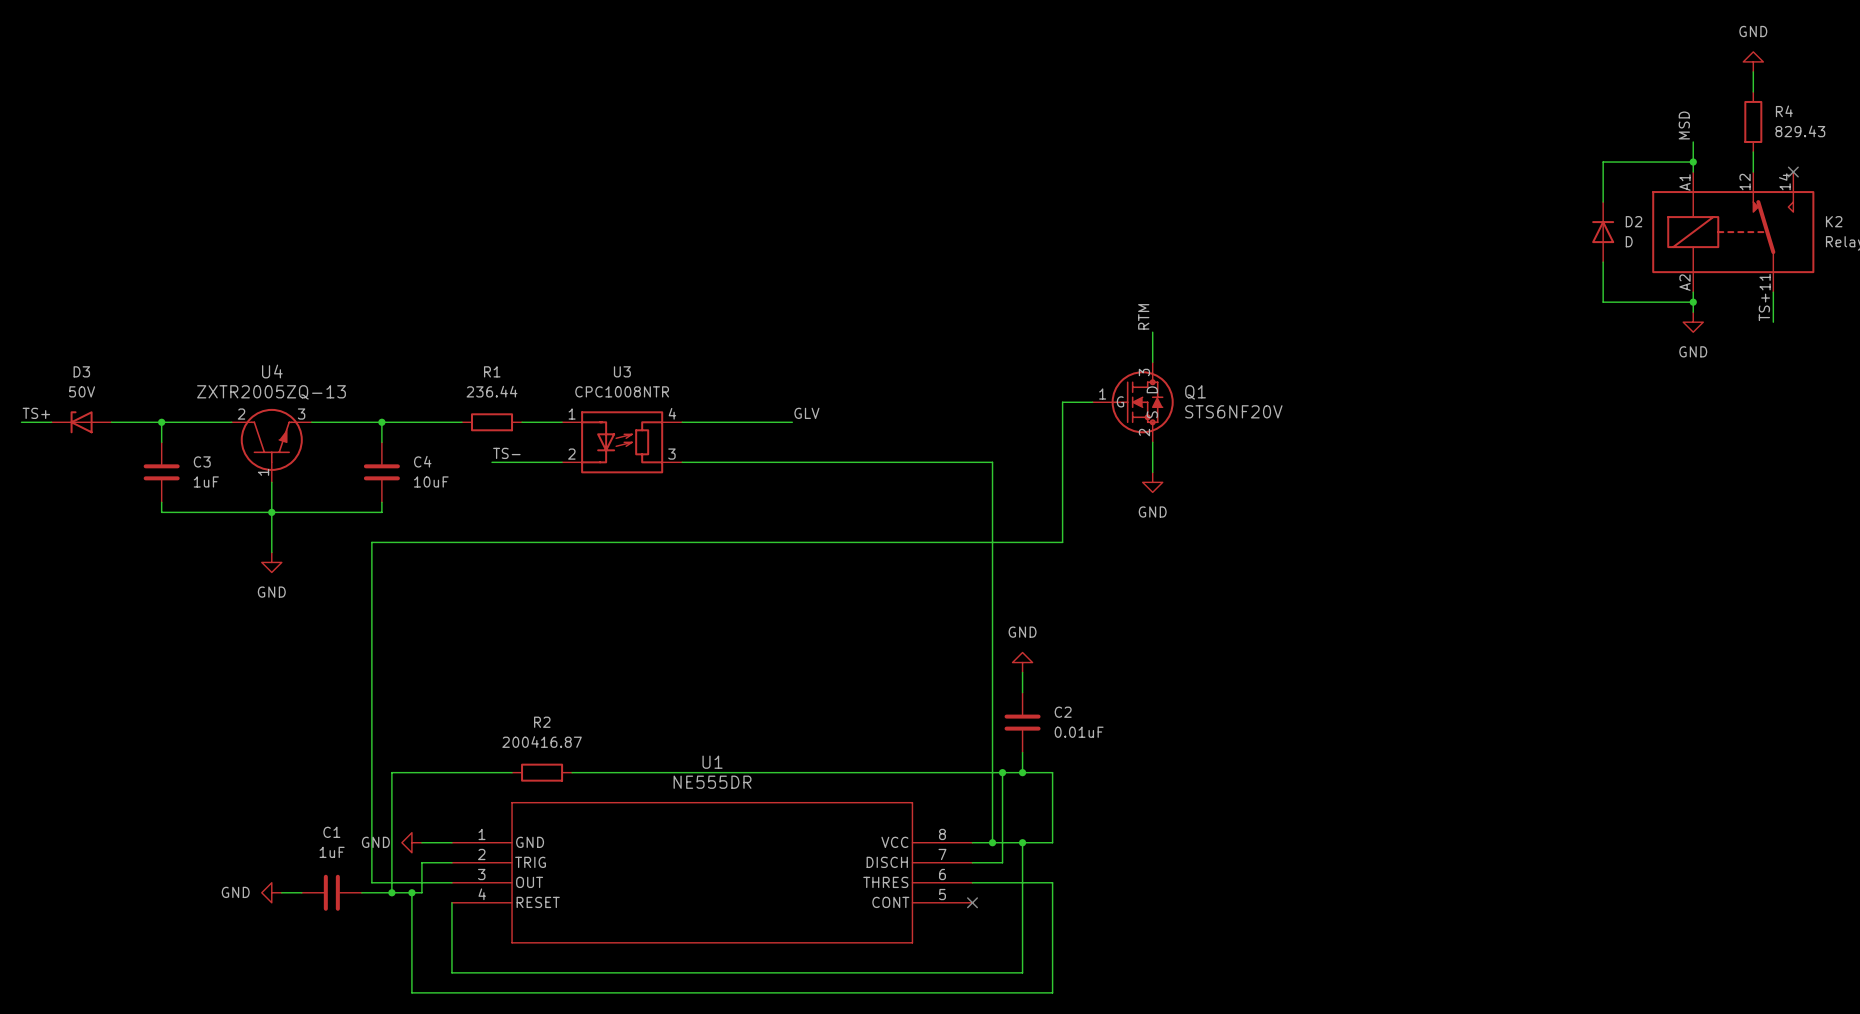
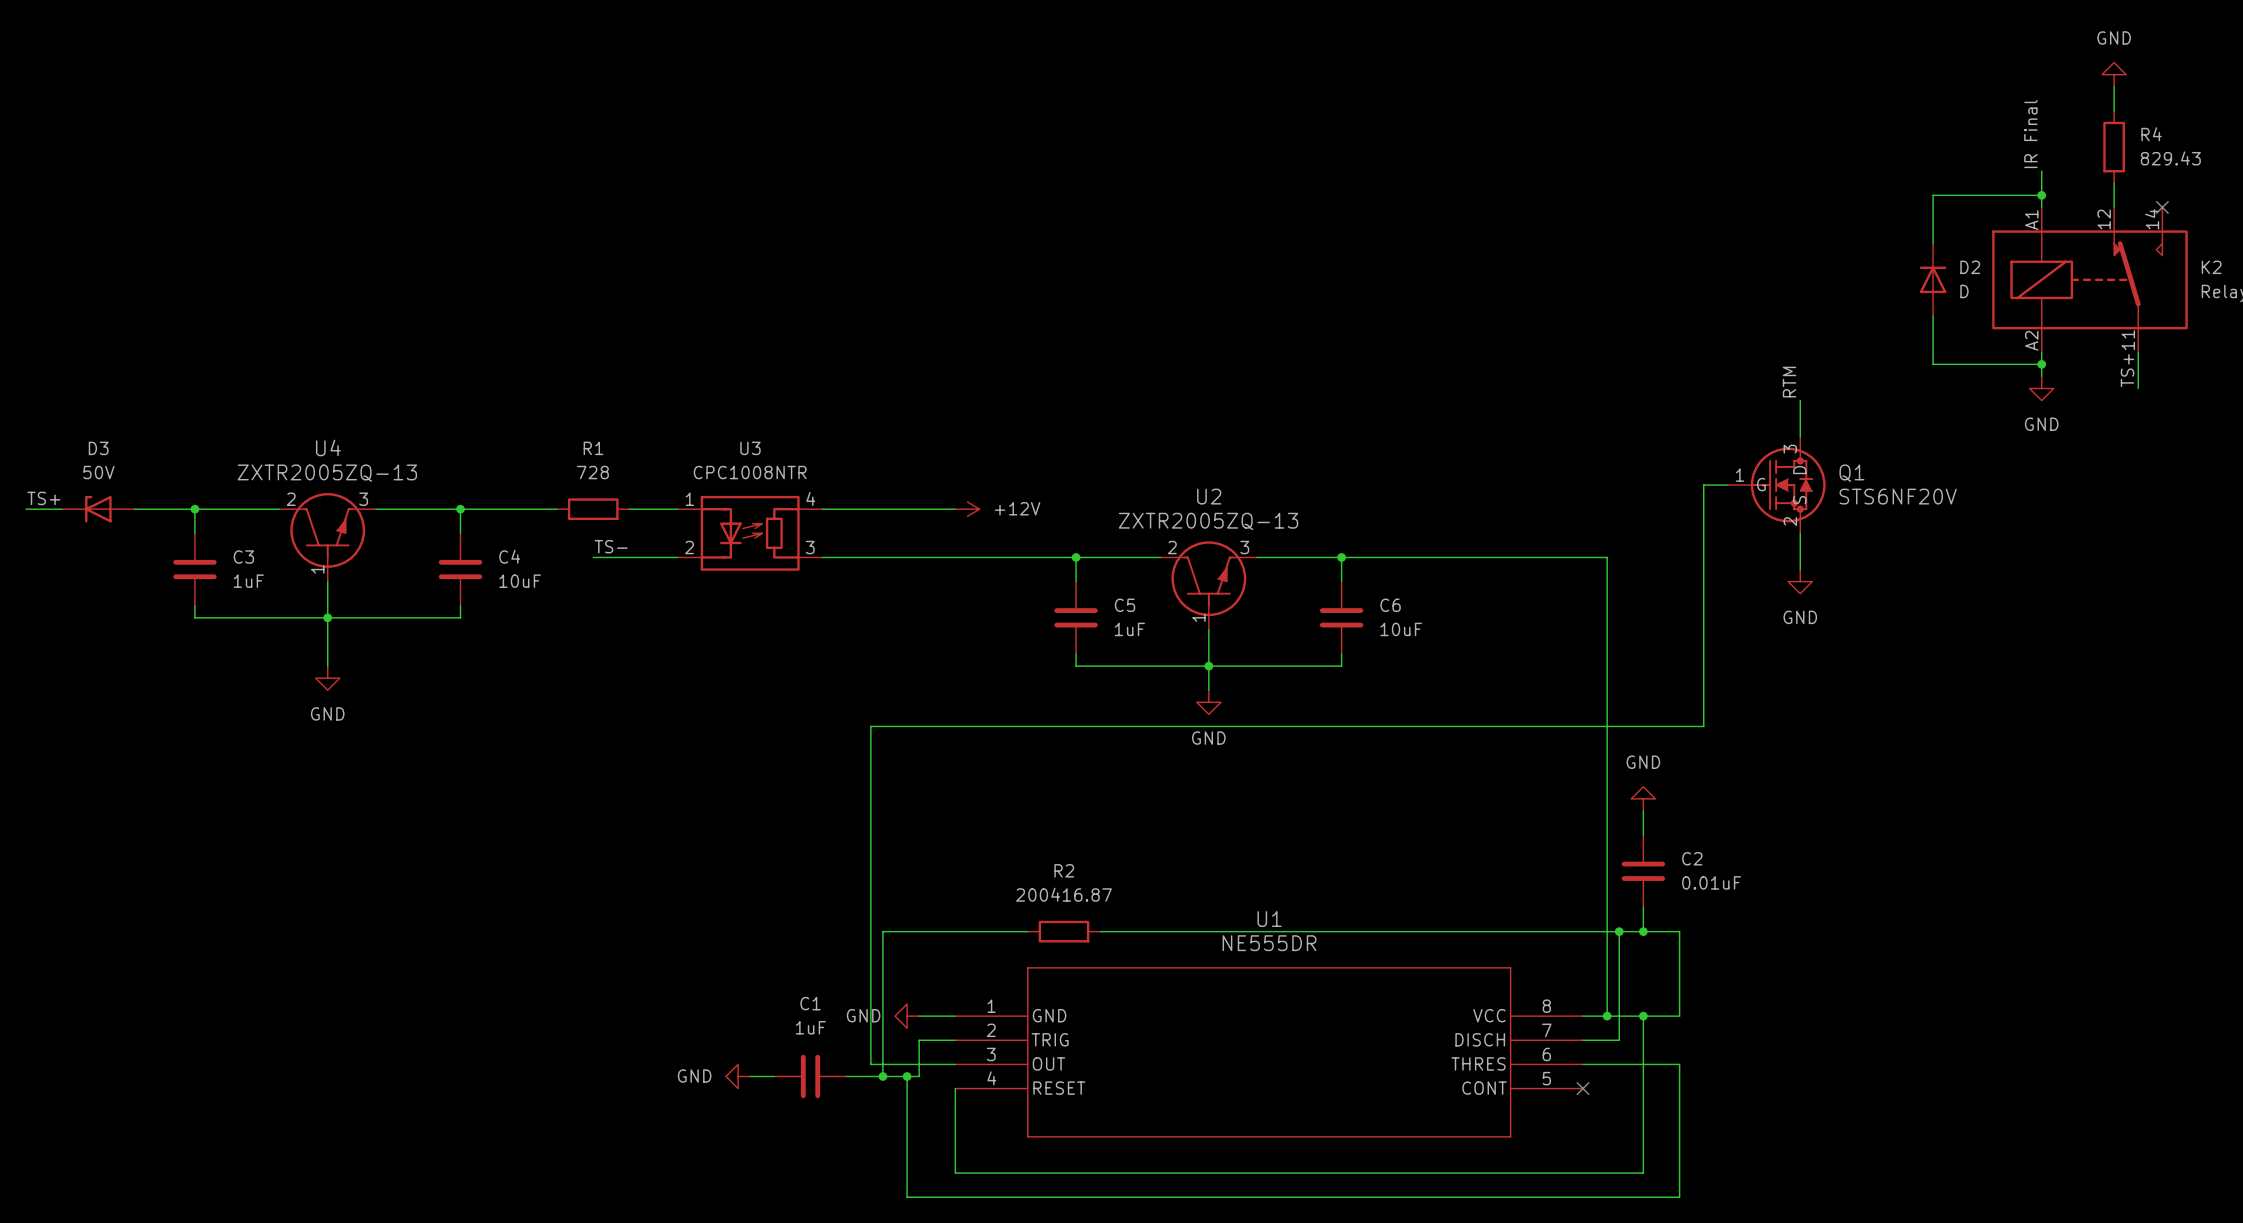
label: MSD (1684, 125) -> IR Final (2030, 134)
label: RTM (1143, 316) -> none
label: none -> RTM (1789, 382)
wire: (1152, 332) (1152, 362) -> none
wire: none -> (1800, 400) (1800, 436)
R1 value: 236.44 (492, 391) -> 728 (592, 472)
wire: (1092, 402) (1062, 402) (1062, 542) (371, 542) (371, 882) (451, 882) -> none
Q1 position: (1133, 402) -> (1776, 485)
wire: none -> (1727, 485) (1703, 485) (1703, 726) (870, 726) (870, 1064) (955, 1064)
label: GLV (806, 413) -> none
power symbol: none -> +12V (967, 509)
wire: (1152, 442) (1152, 472) -> none
wire: none -> (1800, 533) (1800, 569)
wire: none -> (1076, 557) (1076, 581)
junction: none -> (1076, 557)
wire: (962, 462) (992, 462) (992, 842) -> none
wire: none -> (1257, 557) (1607, 557) (1607, 1016)
wire: none -> (1341, 557) (1341, 581)
junction: none -> (1341, 557)
power symbol: GND (1152, 482) -> none
power symbol: none -> GND (1800, 581)
U2: none -> ZXTR2005ZQ-13 (1208, 585)
C5: none -> 1uF (1076, 617)
C6: none -> 10uF (1341, 617)
wire: none -> (1208, 629) (1208, 690)
wire: none -> (1076, 654) (1076, 666) (1341, 666) (1341, 654)
junction: none -> (1208, 666)
power symbol rotation: 0° (1022, 662) -> 180° (1208, 702)
power symbol position: GND (1022, 662) -> GND (1208, 702)
power symbol: none -> GND (1643, 798)
wire: (1022, 672) (1022, 692) -> none
wire: none -> (1643, 810) (1643, 835)
C2 position: (1022, 722) -> (1643, 871)
wire: (1022, 752) (1022, 772) -> none
wire: none -> (1643, 907) (1643, 931)
wire: (512, 772) (391, 772) (391, 892) -> none
R2 position: (542, 772) -> (1064, 931)
wire: (572, 772) (732, 772) -> (882, 1076) (882, 931)
wire: (852, 772) (912, 772) -> none
wire: (1002, 772) (1002, 862) (972, 862) -> none
junction: (1002, 772) -> none
junction: (1022, 772) -> none
wire: (1052, 772) (1052, 842) (972, 842) -> (1269, 931) (1679, 931) (1679, 1016) (1583, 1016)
wire: none -> (1619, 931) (1619, 1040) (1583, 1040)
junction: none -> (1619, 931)
junction: none -> (1643, 931)
power symbol: GND (411, 842) -> none
wire: (421, 842) (451, 842) -> none
power symbol: none -> GND (907, 1016)
wire: none -> (919, 1016) (955, 1016)
junction: (992, 842) -> none
wire: (1022, 842) (1022, 972) -> (1643, 1016) (1643, 1173) (1232, 1173)
junction: (1022, 842) -> none
junction: none -> (1607, 1016)
junction: none -> (1643, 1016)
wire: (451, 862) (421, 862) (421, 892) (361, 892) -> none
wire: none -> (955, 1040) (919, 1040) (919, 1076) (846, 1076)
U1 position: (712, 872) -> (1269, 1052)
wire: (972, 882) (1052, 882) (1052, 992) -> (1583, 1064) (1679, 1064) (1679, 1197) (1269, 1197)
power symbol: GND (271, 892) -> none
wire: (281, 892) (301, 892) -> none
C1 position: (331, 892) -> (810, 1076)
junction: (391, 892) -> none
wire: (411, 892) (411, 992) (752, 992) -> (907, 1076) (907, 1197)
junction: (411, 892) -> none
power symbol: none -> GND (738, 1076)
wire: none -> (750, 1076) (774, 1076)
junction: none -> (882, 1076)
junction: none -> (907, 1076)
wire: (451, 902) (451, 972) (792, 972) -> (955, 1088) (955, 1173)
no-connect mark: (972, 902) -> none
no-connect mark: none -> (1583, 1088)

